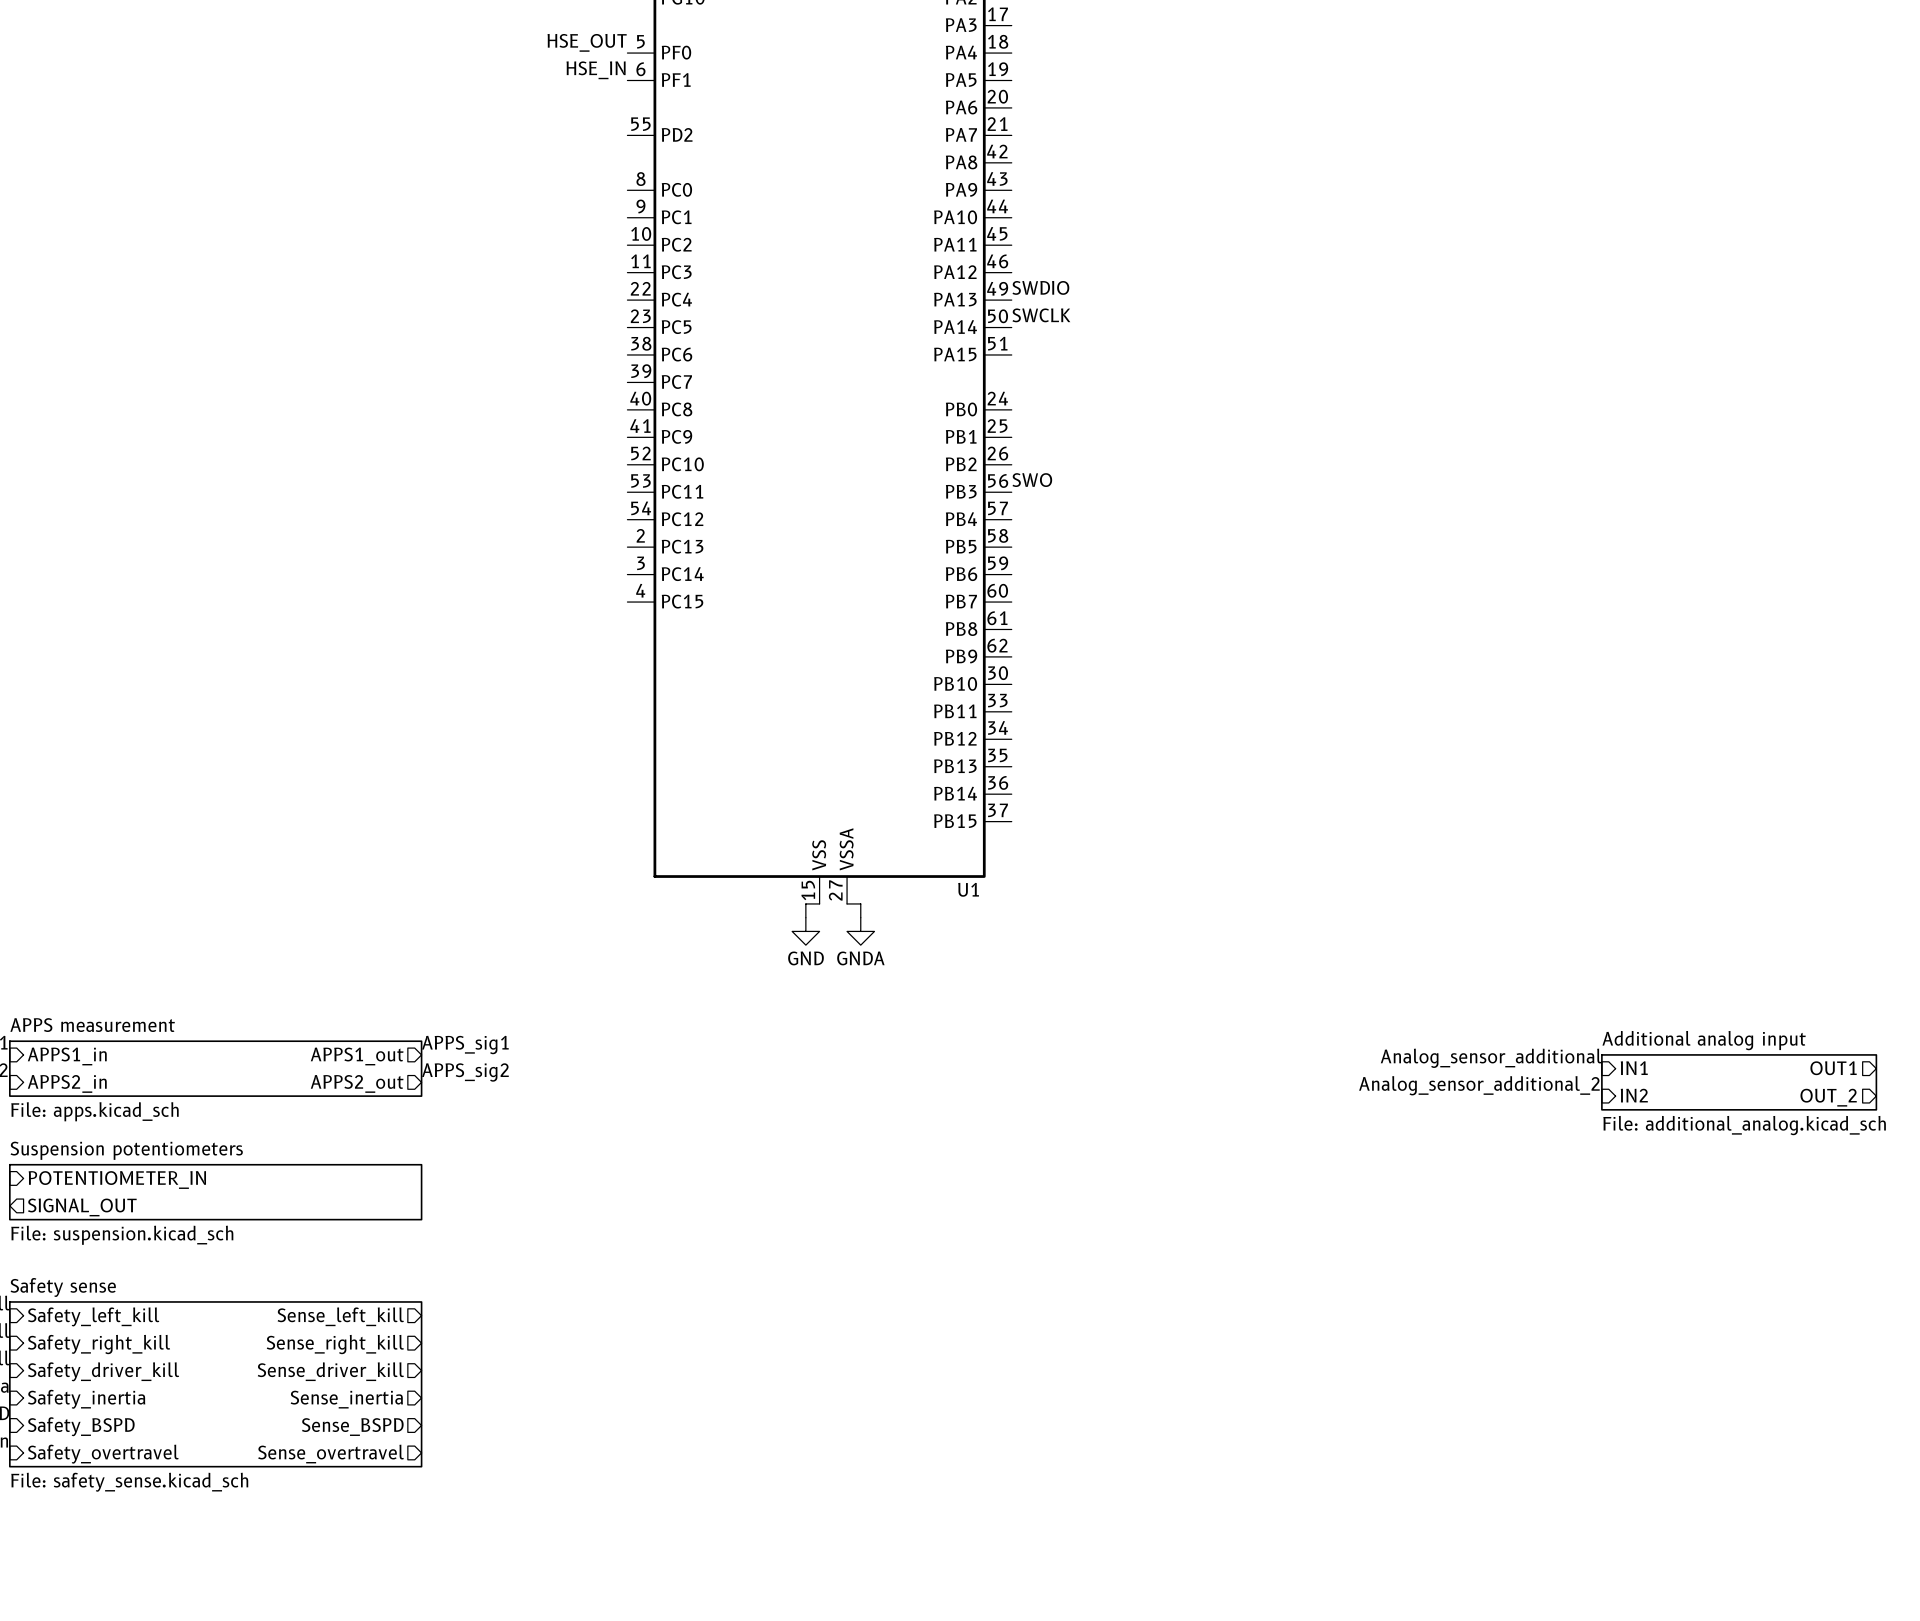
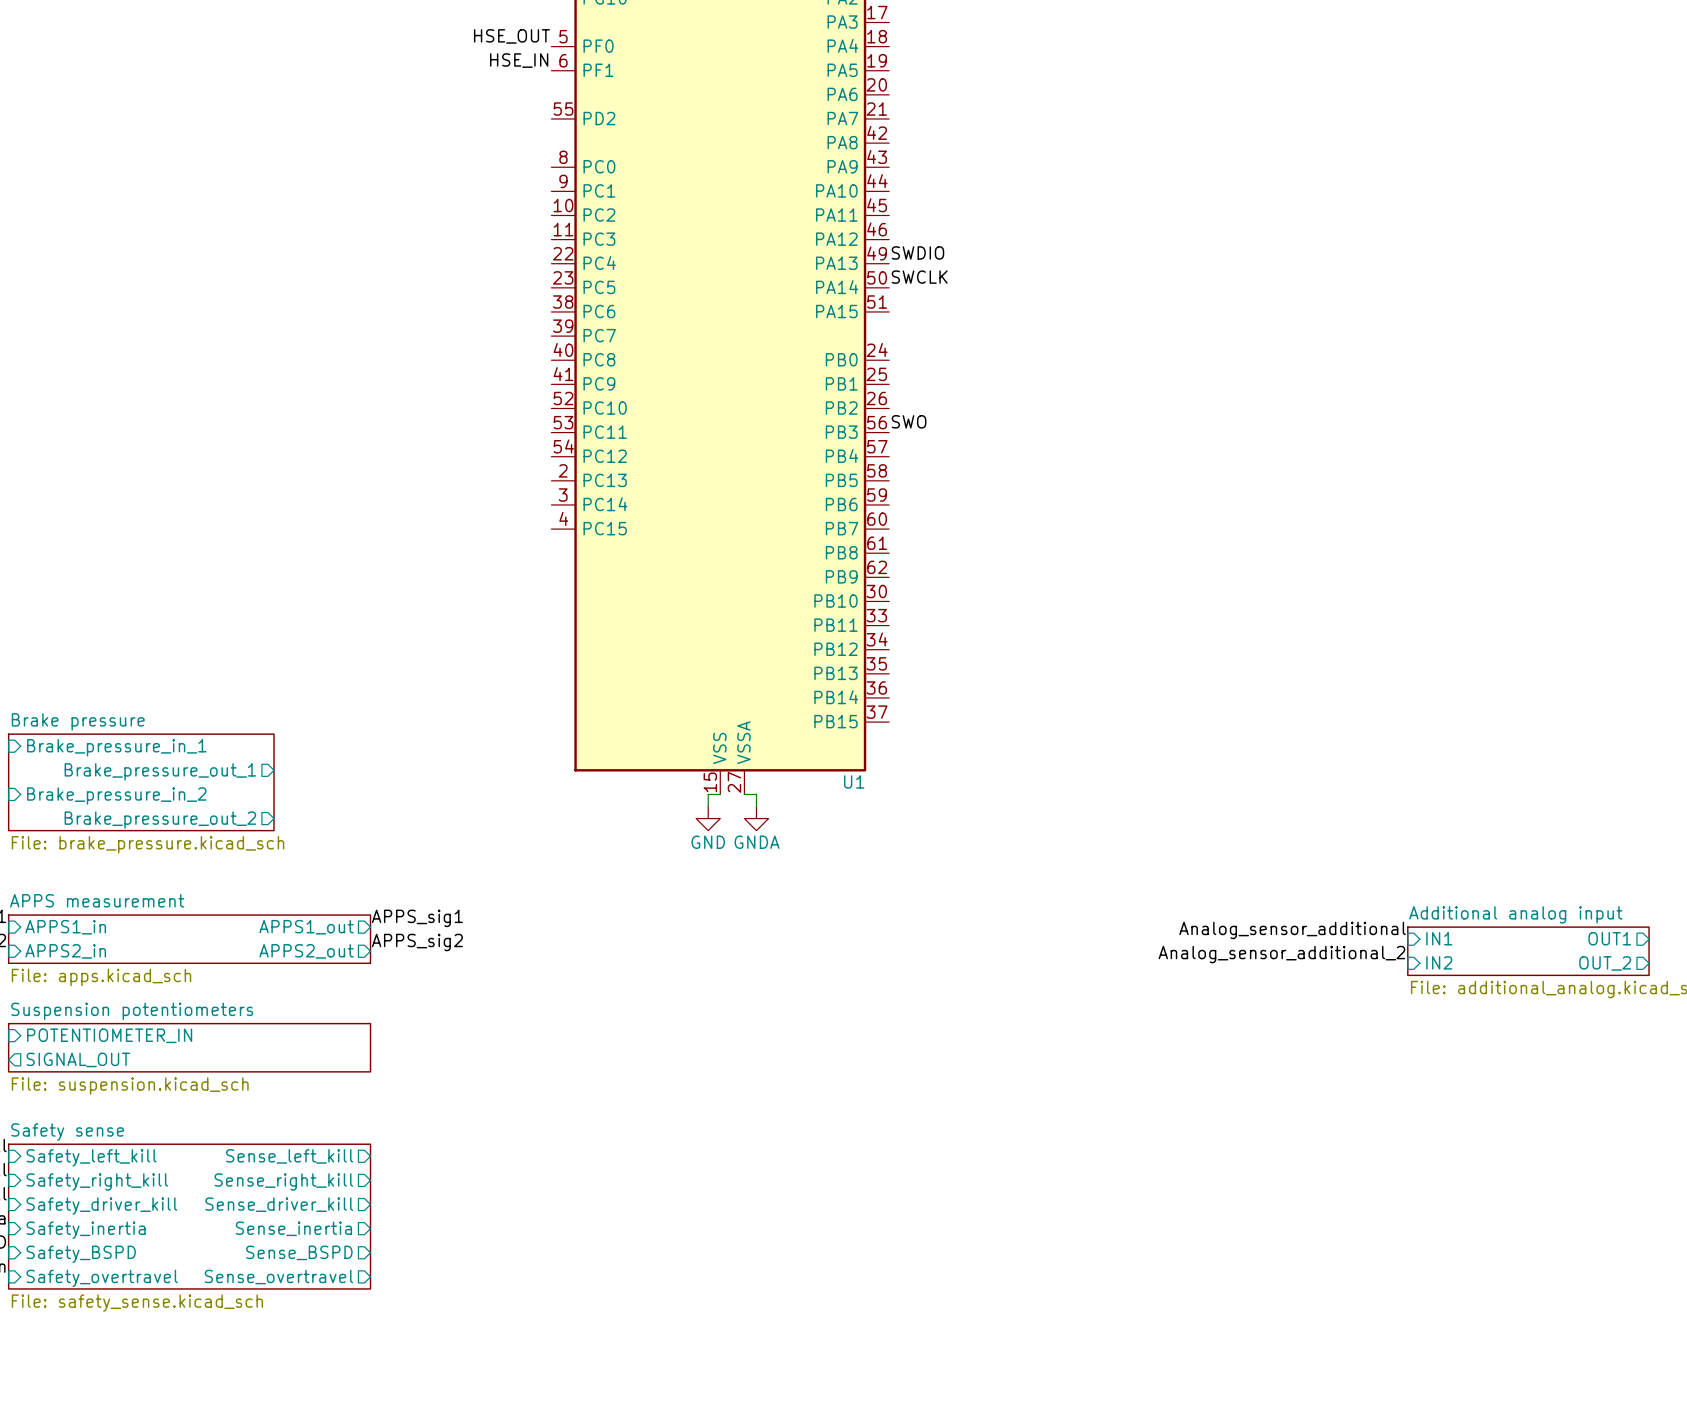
sheet pin: none -> Brake_pressure_in_1 (116, 747)
sheet pin: none -> Brake_pressure_out_1 (160, 771)
sheet Brake pressure: none -> File: brake_pressure.kicad_sch (141, 782)
sheet pin: none -> Brake_pressure_in_2 (116, 796)
sheet pin: none -> Brake_pressure_out_2 (160, 820)

